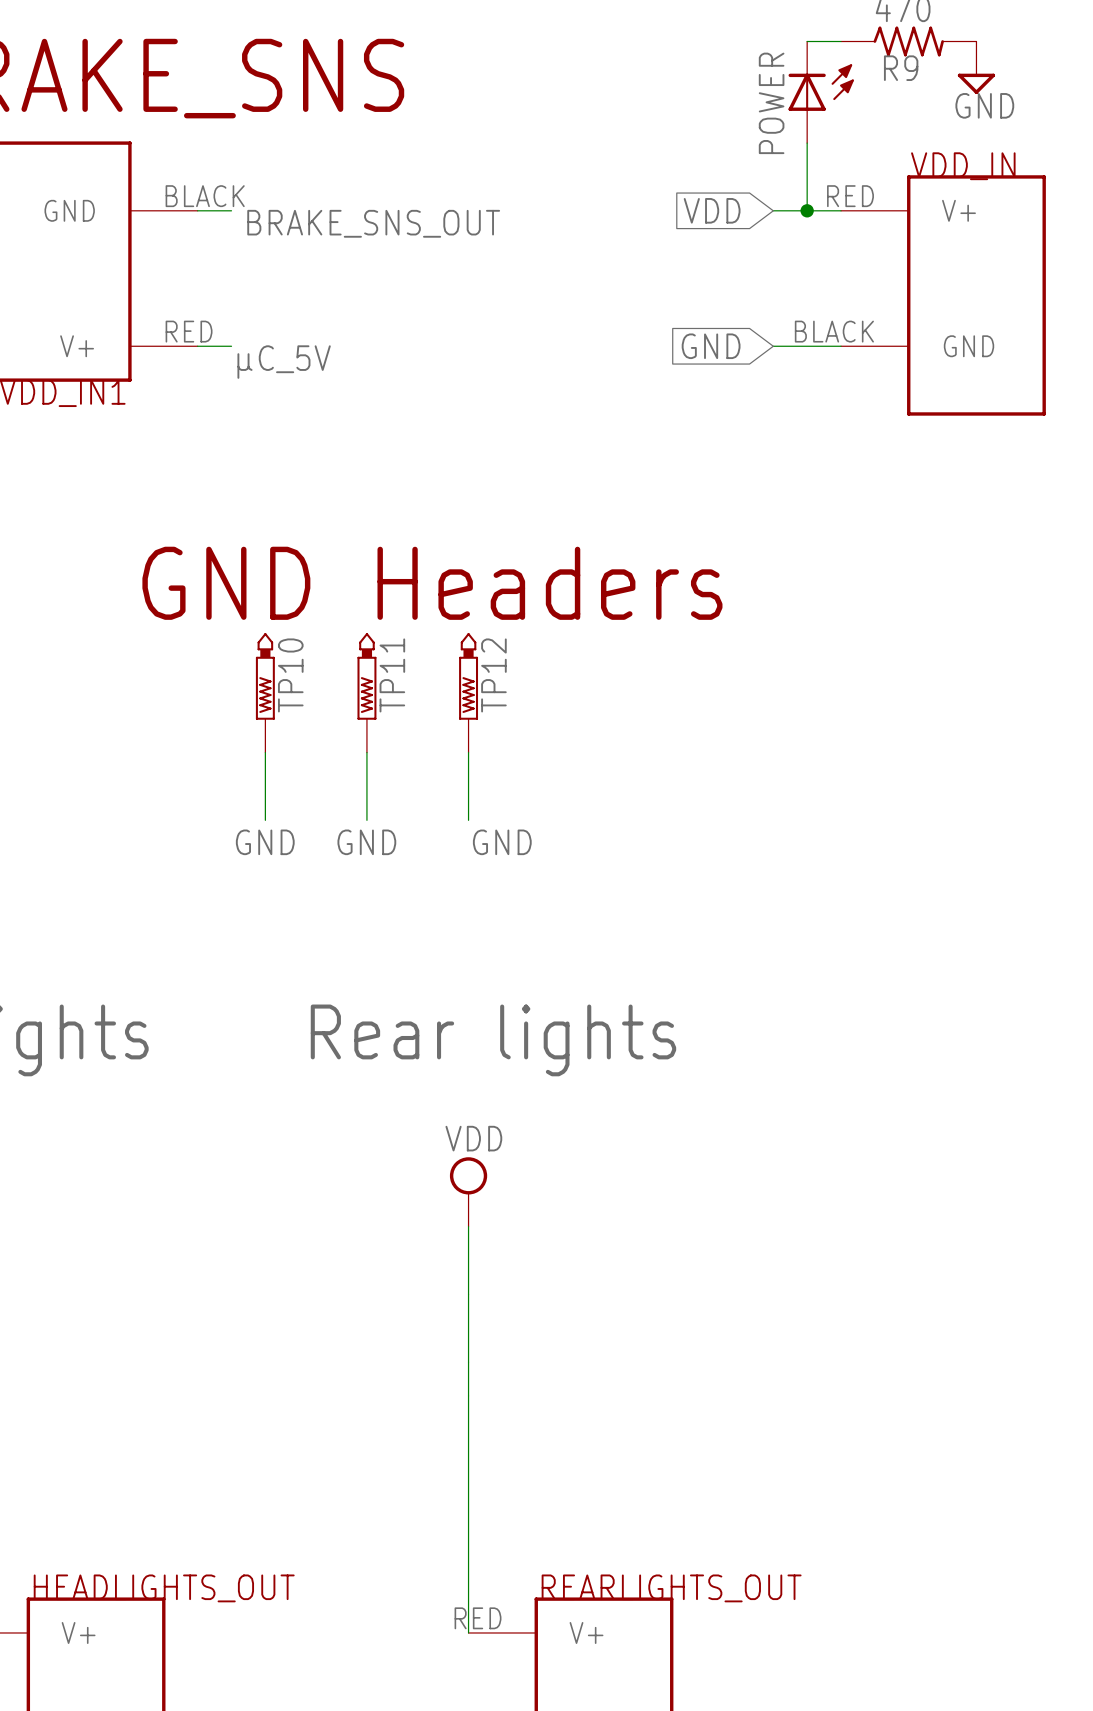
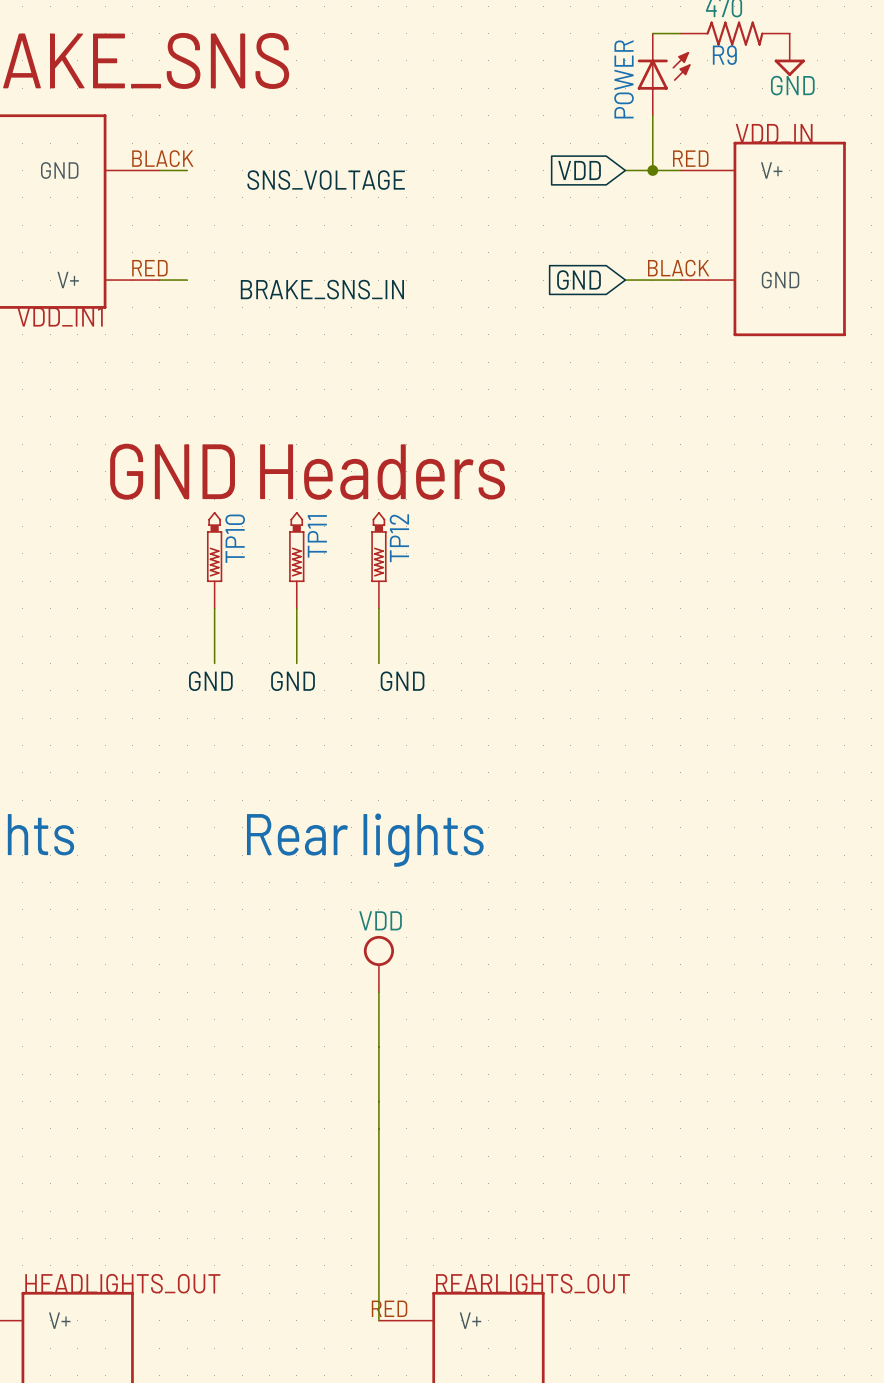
label: BRAKE_SNS_OUT (373, 223) -> SNS_VOLTAGE (326, 180)
label: none -> BRAKE_SNS_IN (322, 289)
label: µC_5V (284, 362) -> none

